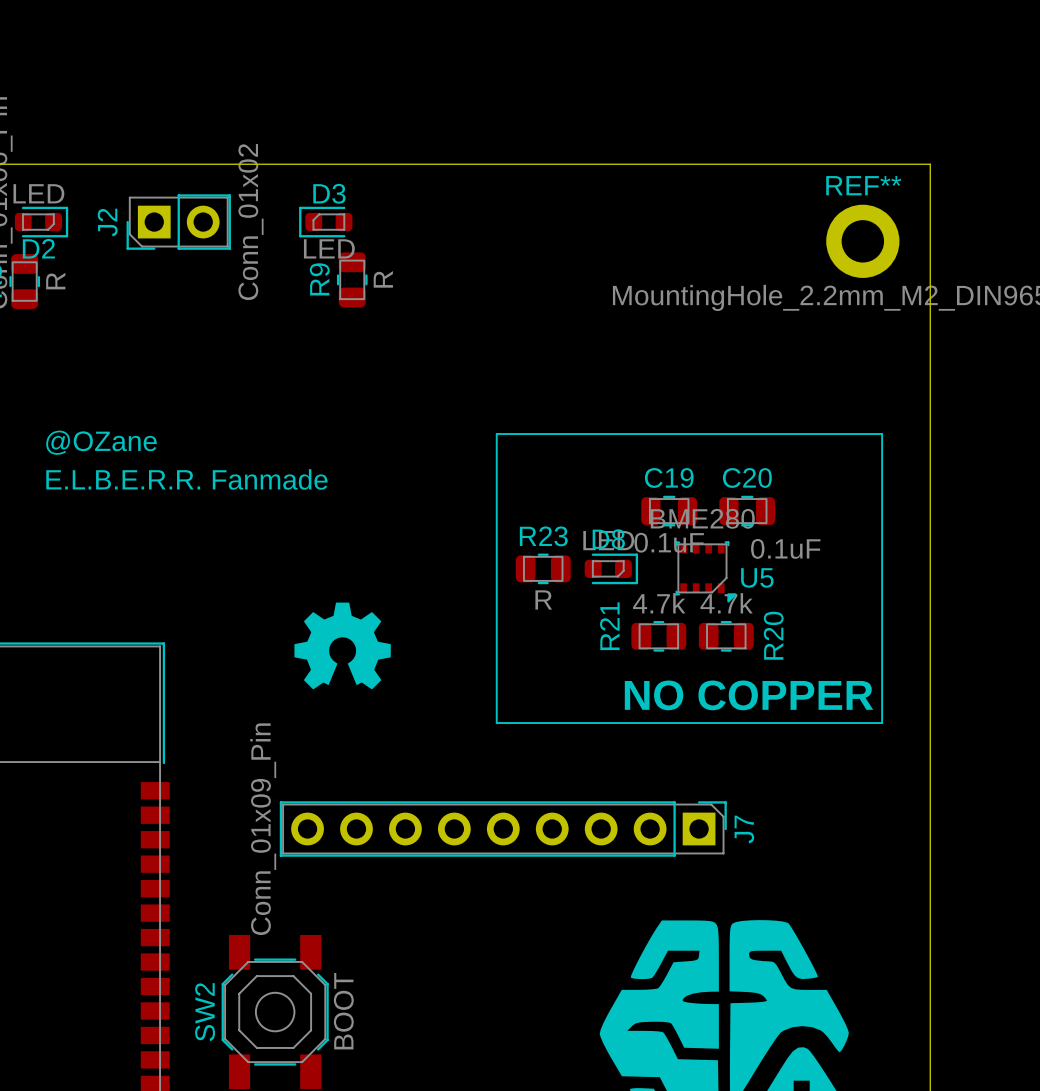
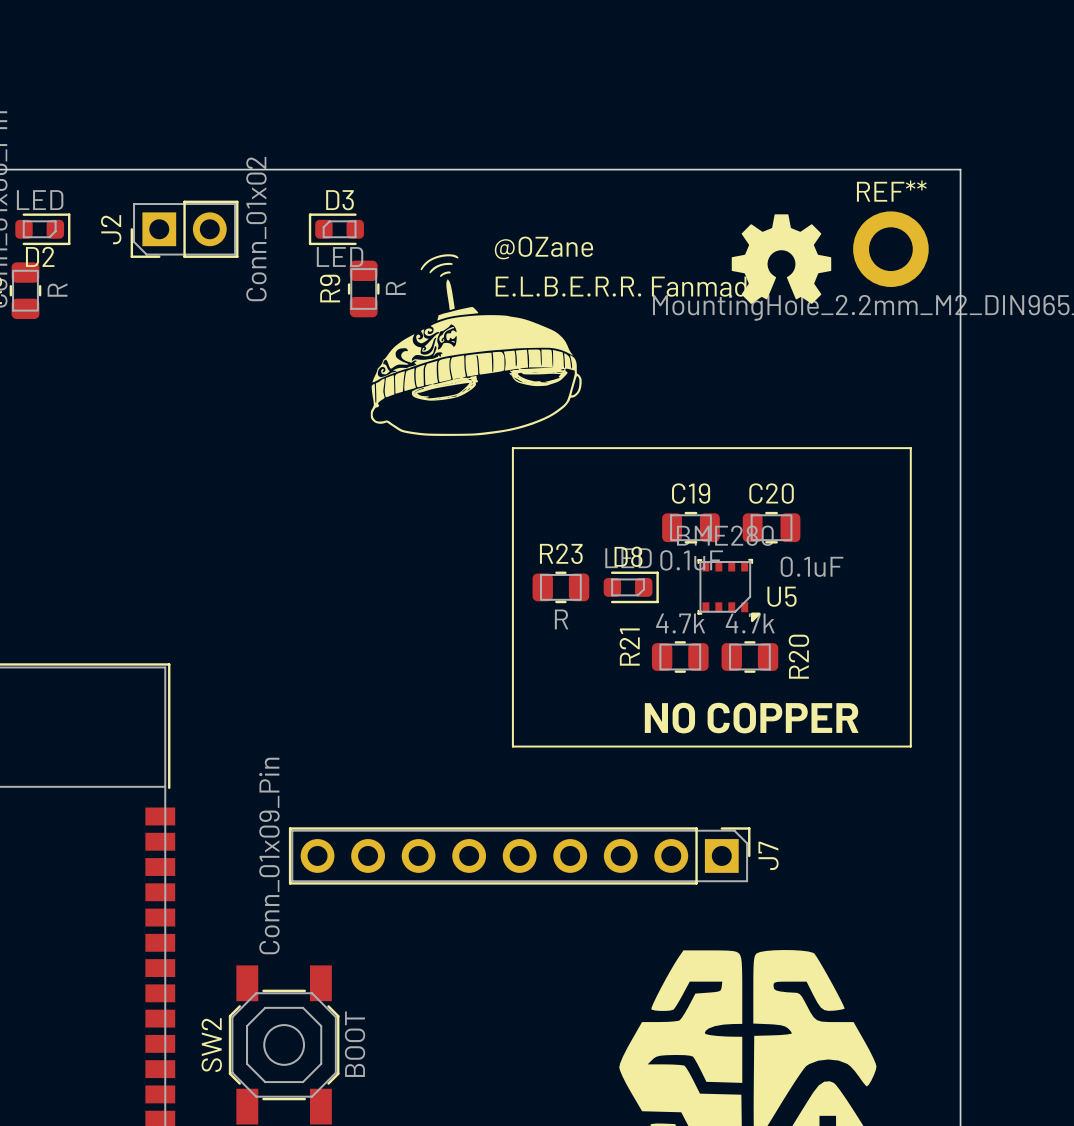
drawing: none -> [731, 214, 832, 304]
drawing: none -> [370, 254, 582, 436]
text position: @OZane (101, 442) -> @OZane (543, 247)
text position: E.L.B.E.R.R. Fanmade (186, 479) -> E.L.B.E.R.R. Fanmade (628, 286)
drawing: [294, 602, 391, 690] -> none

